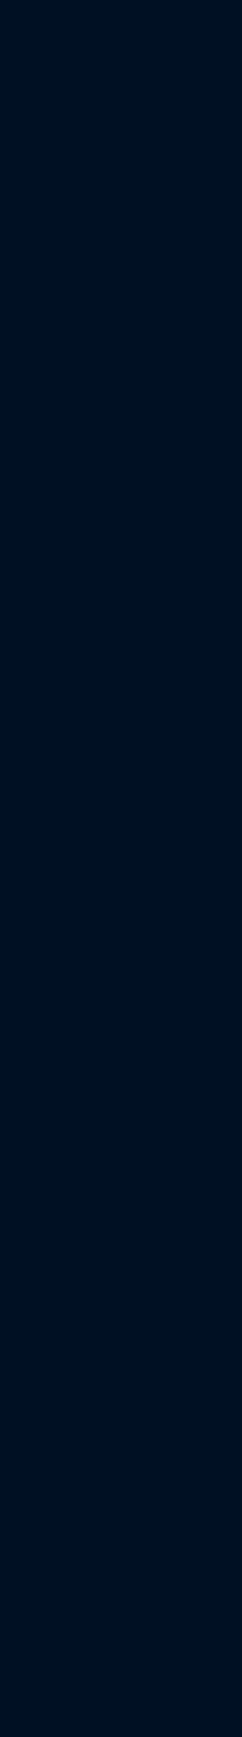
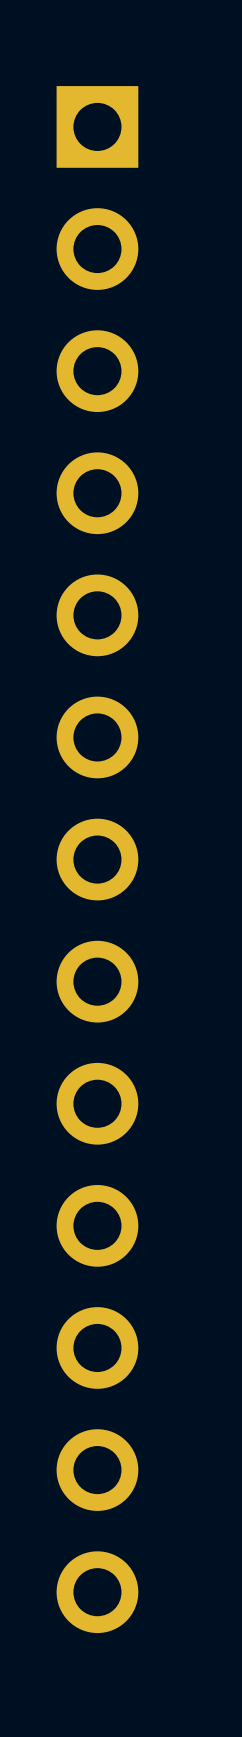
part: none -> (97, 859)

